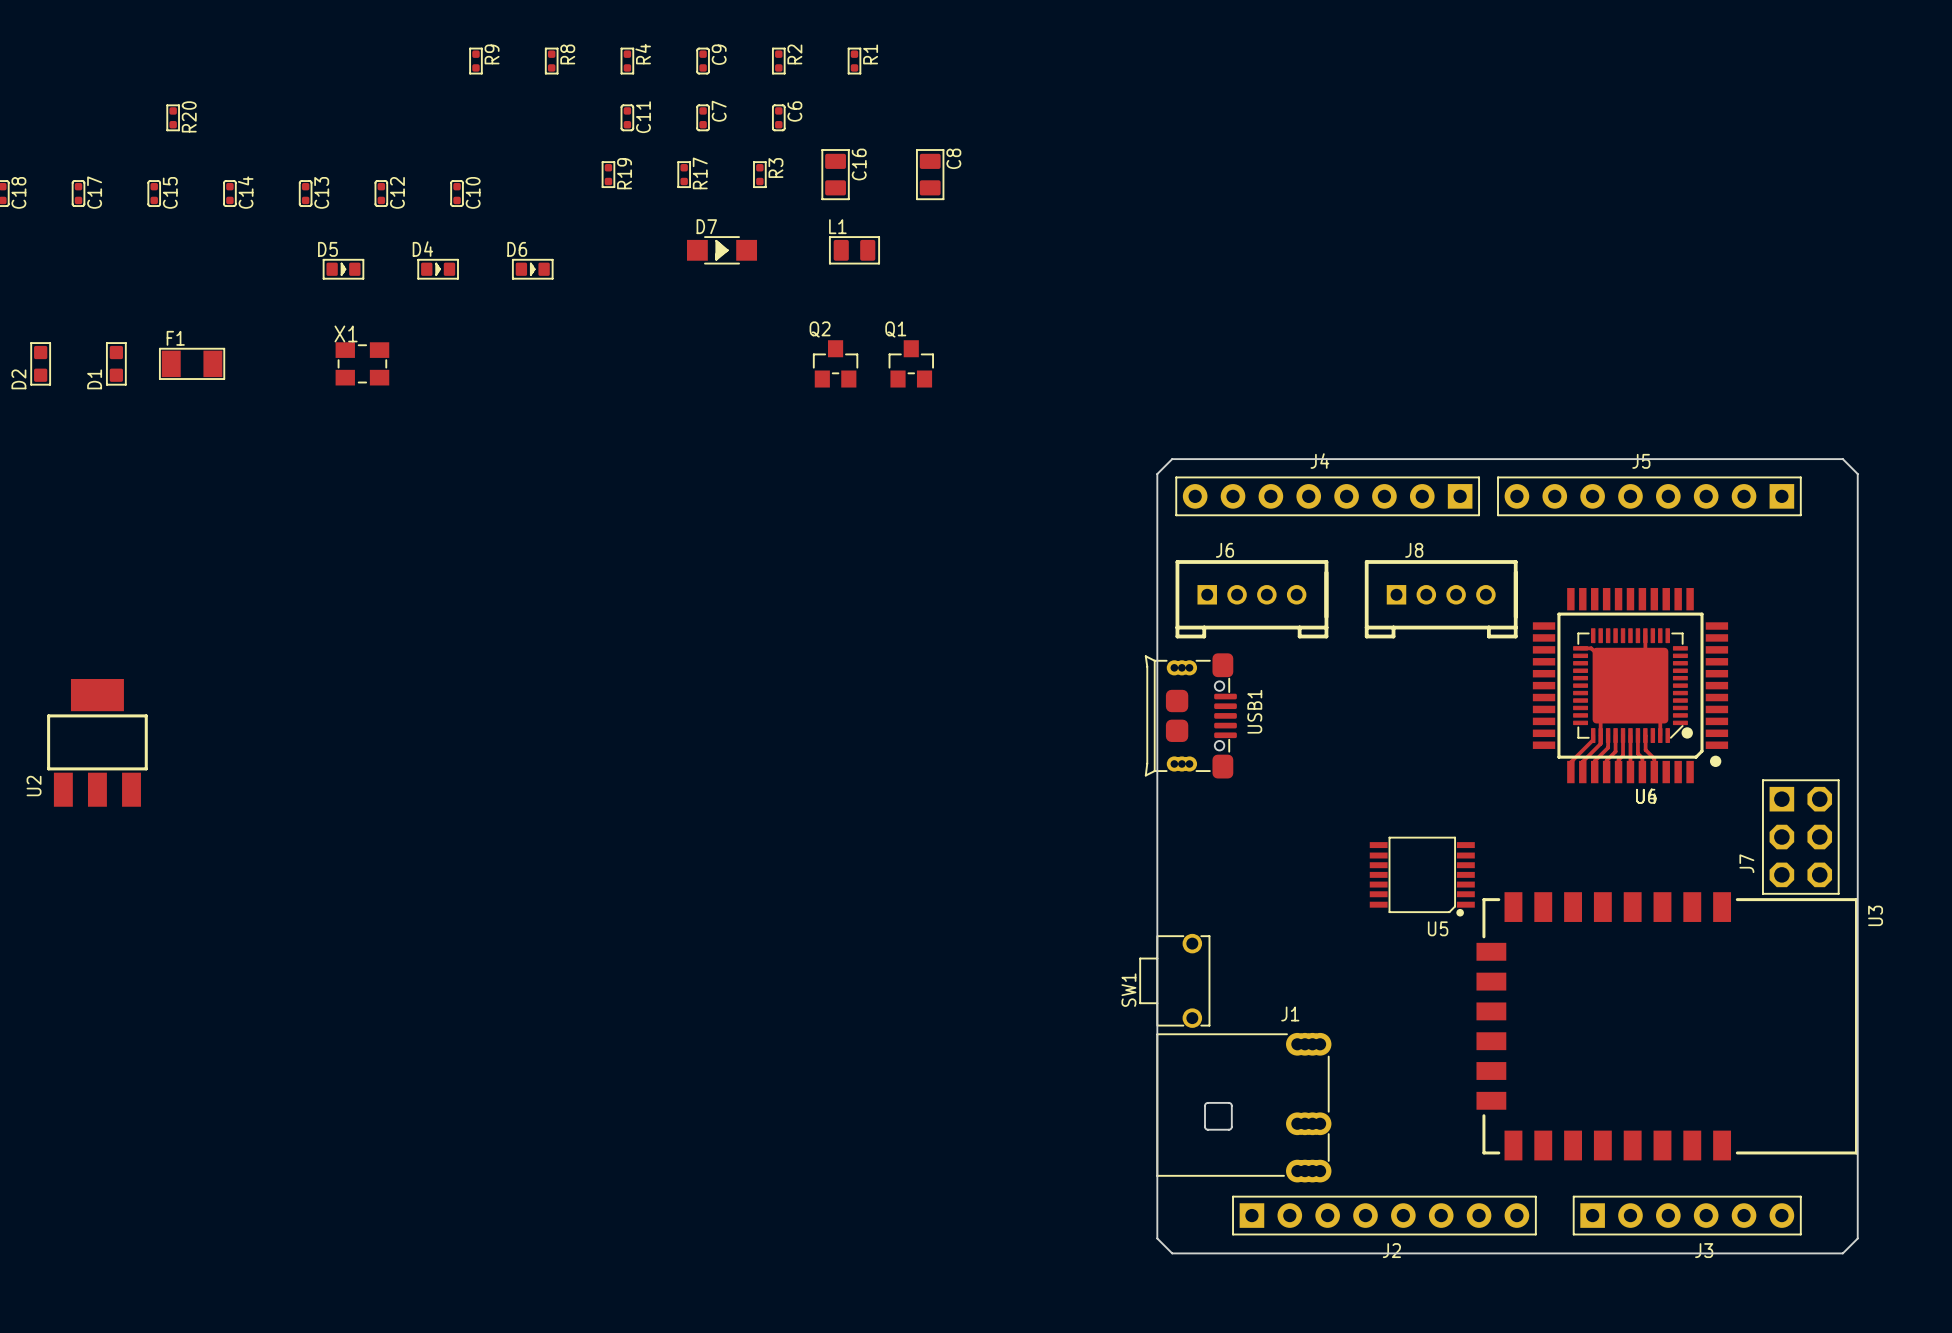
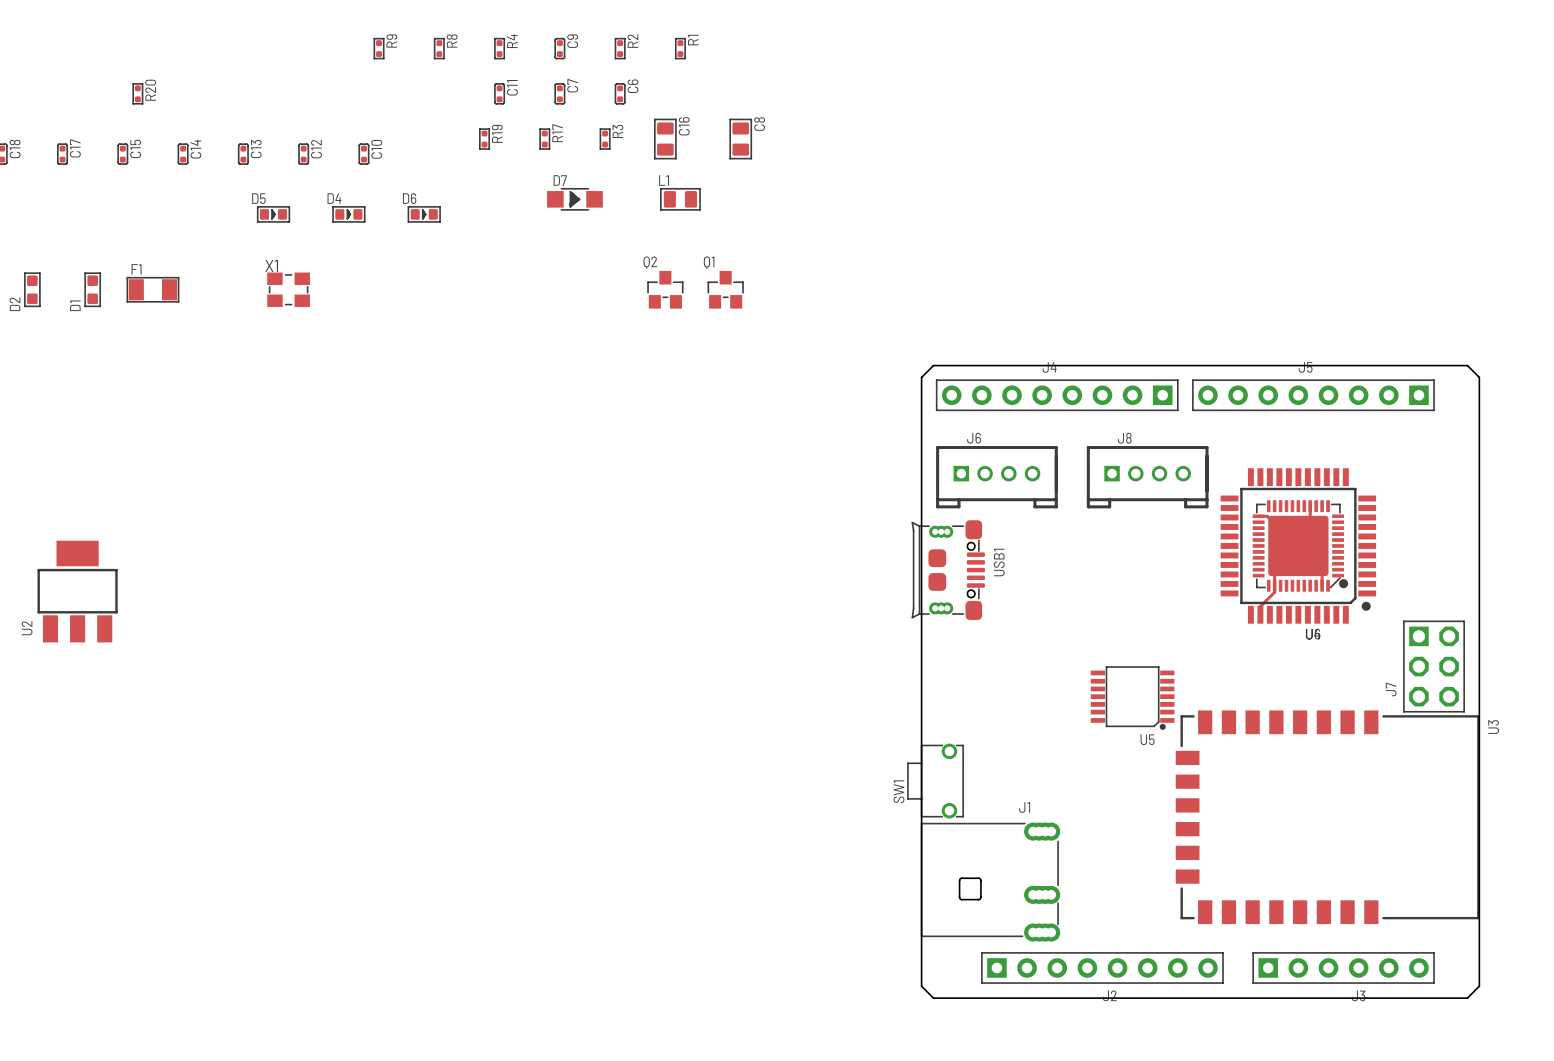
track: (1593, 735) (1593, 739) (1570, 762) (1570, 772) -> none
track: (1607, 735) (1608, 747) (1594, 761) (1594, 772) -> none
track: (1615, 735) (1615, 751) (1606, 760) (1606, 772) -> none
track: (1622, 735) (1623, 755) (1618, 760) (1618, 772) -> none
track: (1630, 735) (1630, 772) -> none
track: (1637, 735) (1637, 753) (1642, 758) (1642, 772) -> none
track: (1645, 735) (1645, 749) (1654, 758) (1654, 772) -> none

